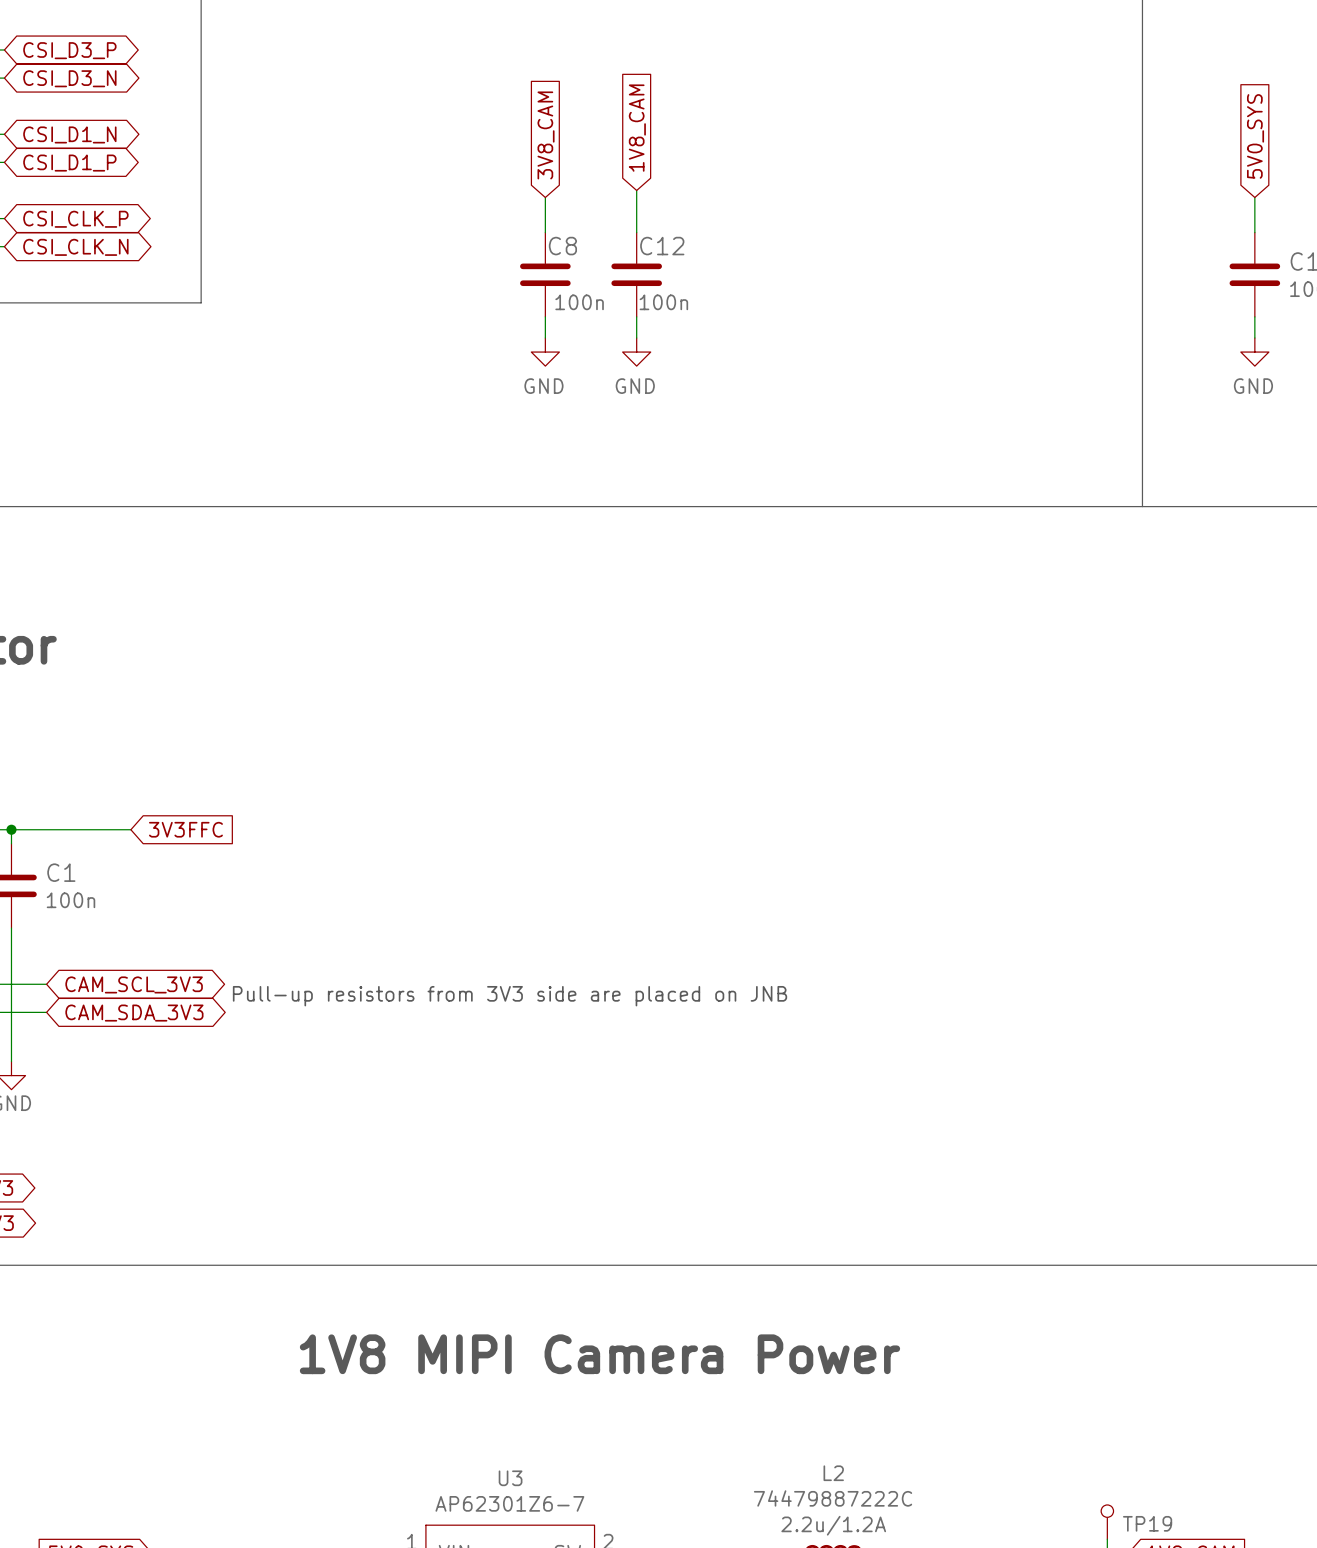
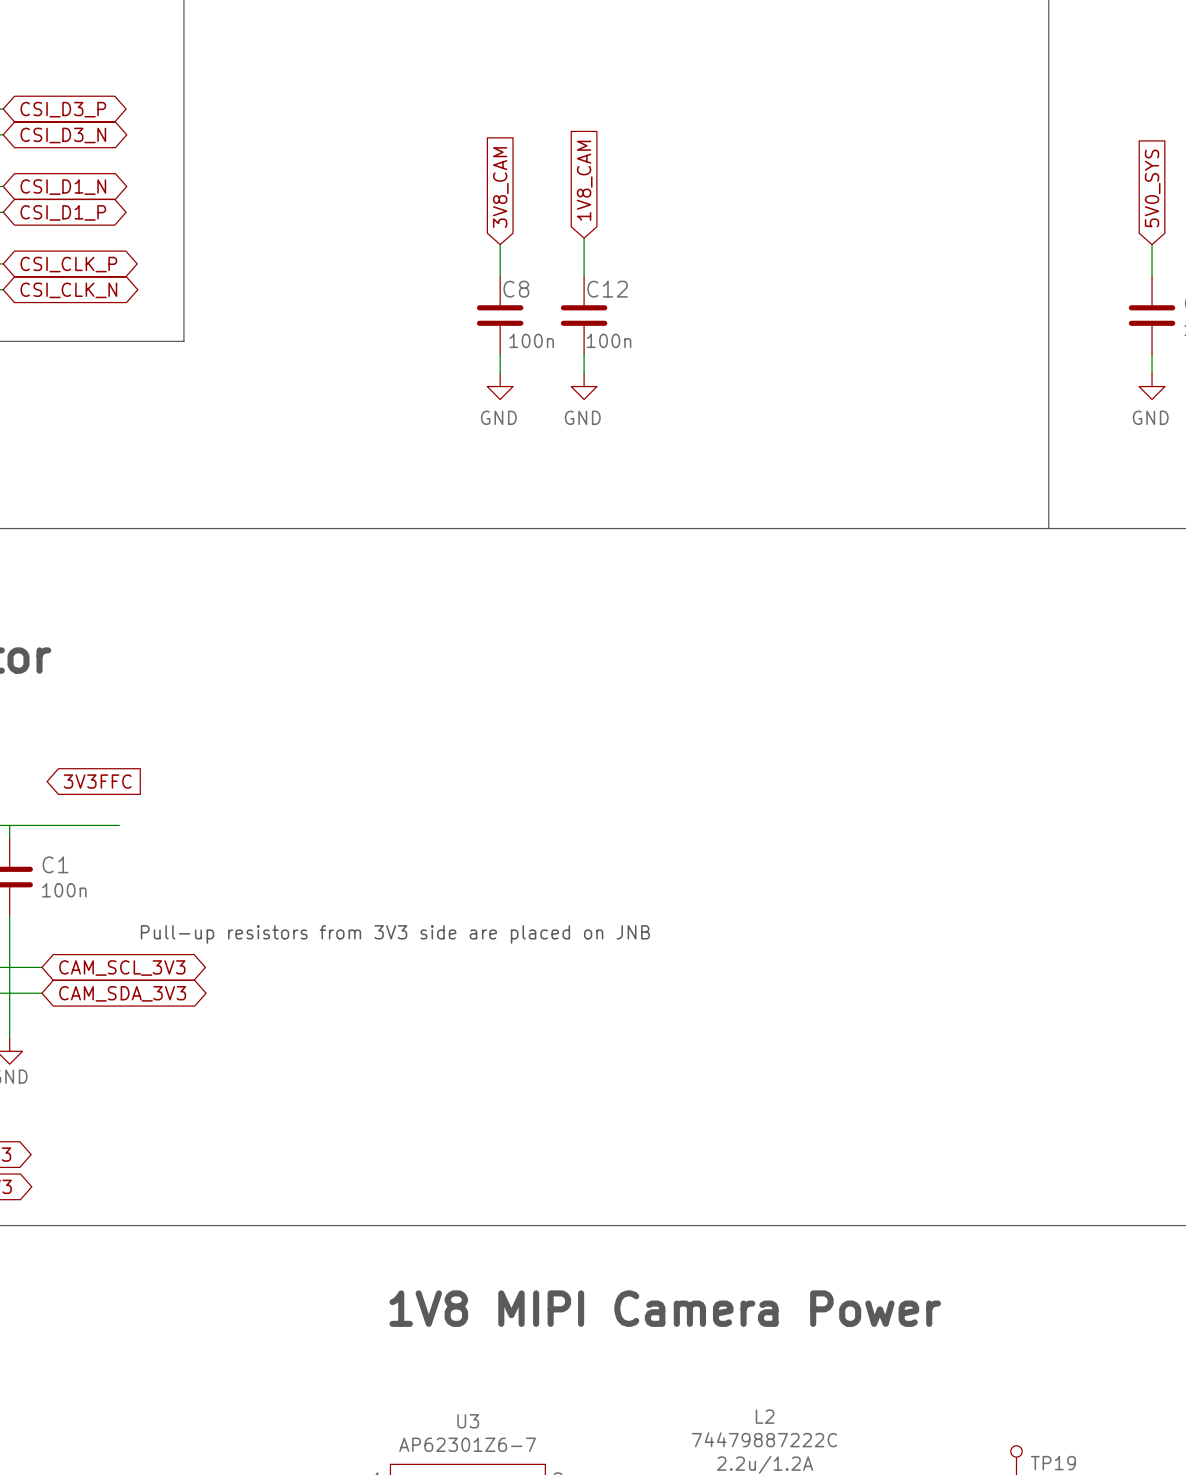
junction: (11, 829) -> none
global label position: 3V3FFC (185, 829) -> 3V3FFC (97, 781)
text position: Pull-up resistors from 3V3 side are placed on JNB (510, 996) -> Pull-up resistors from 3V3 side are placed on JNB (395, 934)
text position: 1V8 MIPI Camera Power (599, 1354) -> 1V8 MIPI Camera Power (665, 1308)

